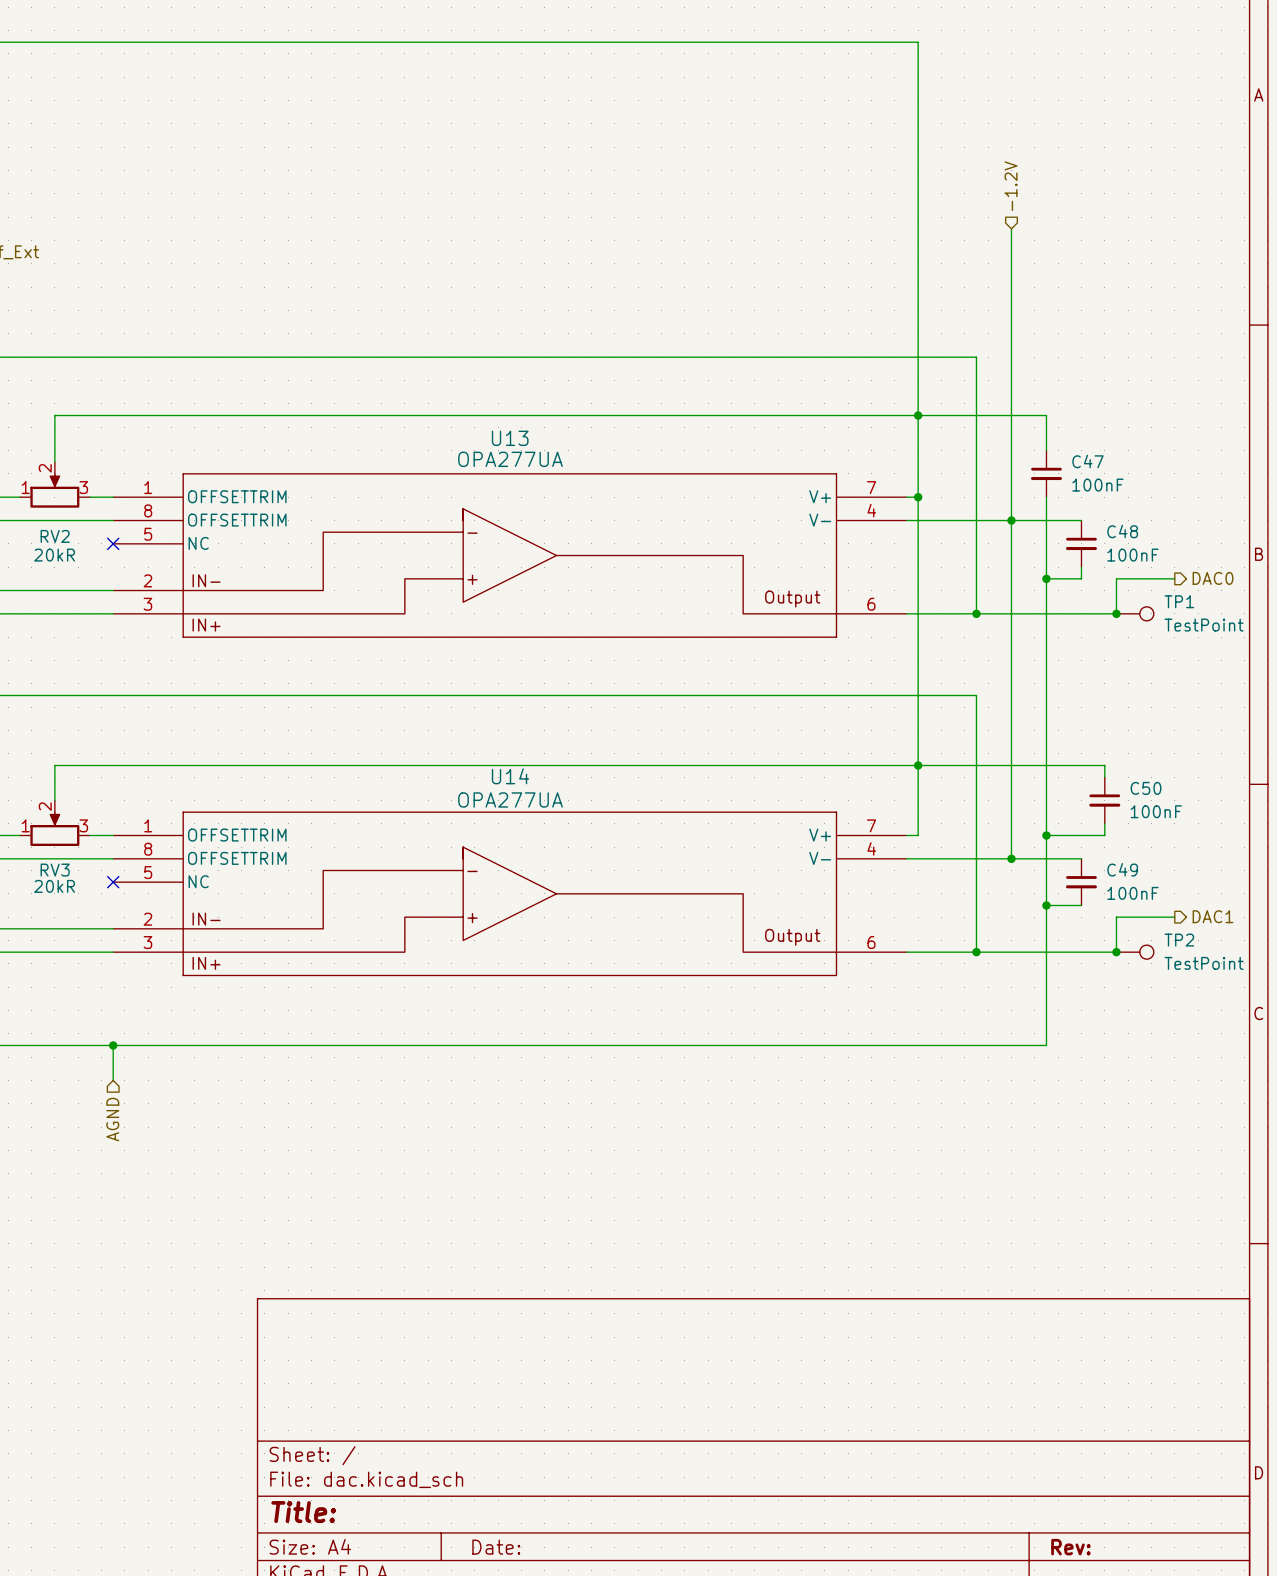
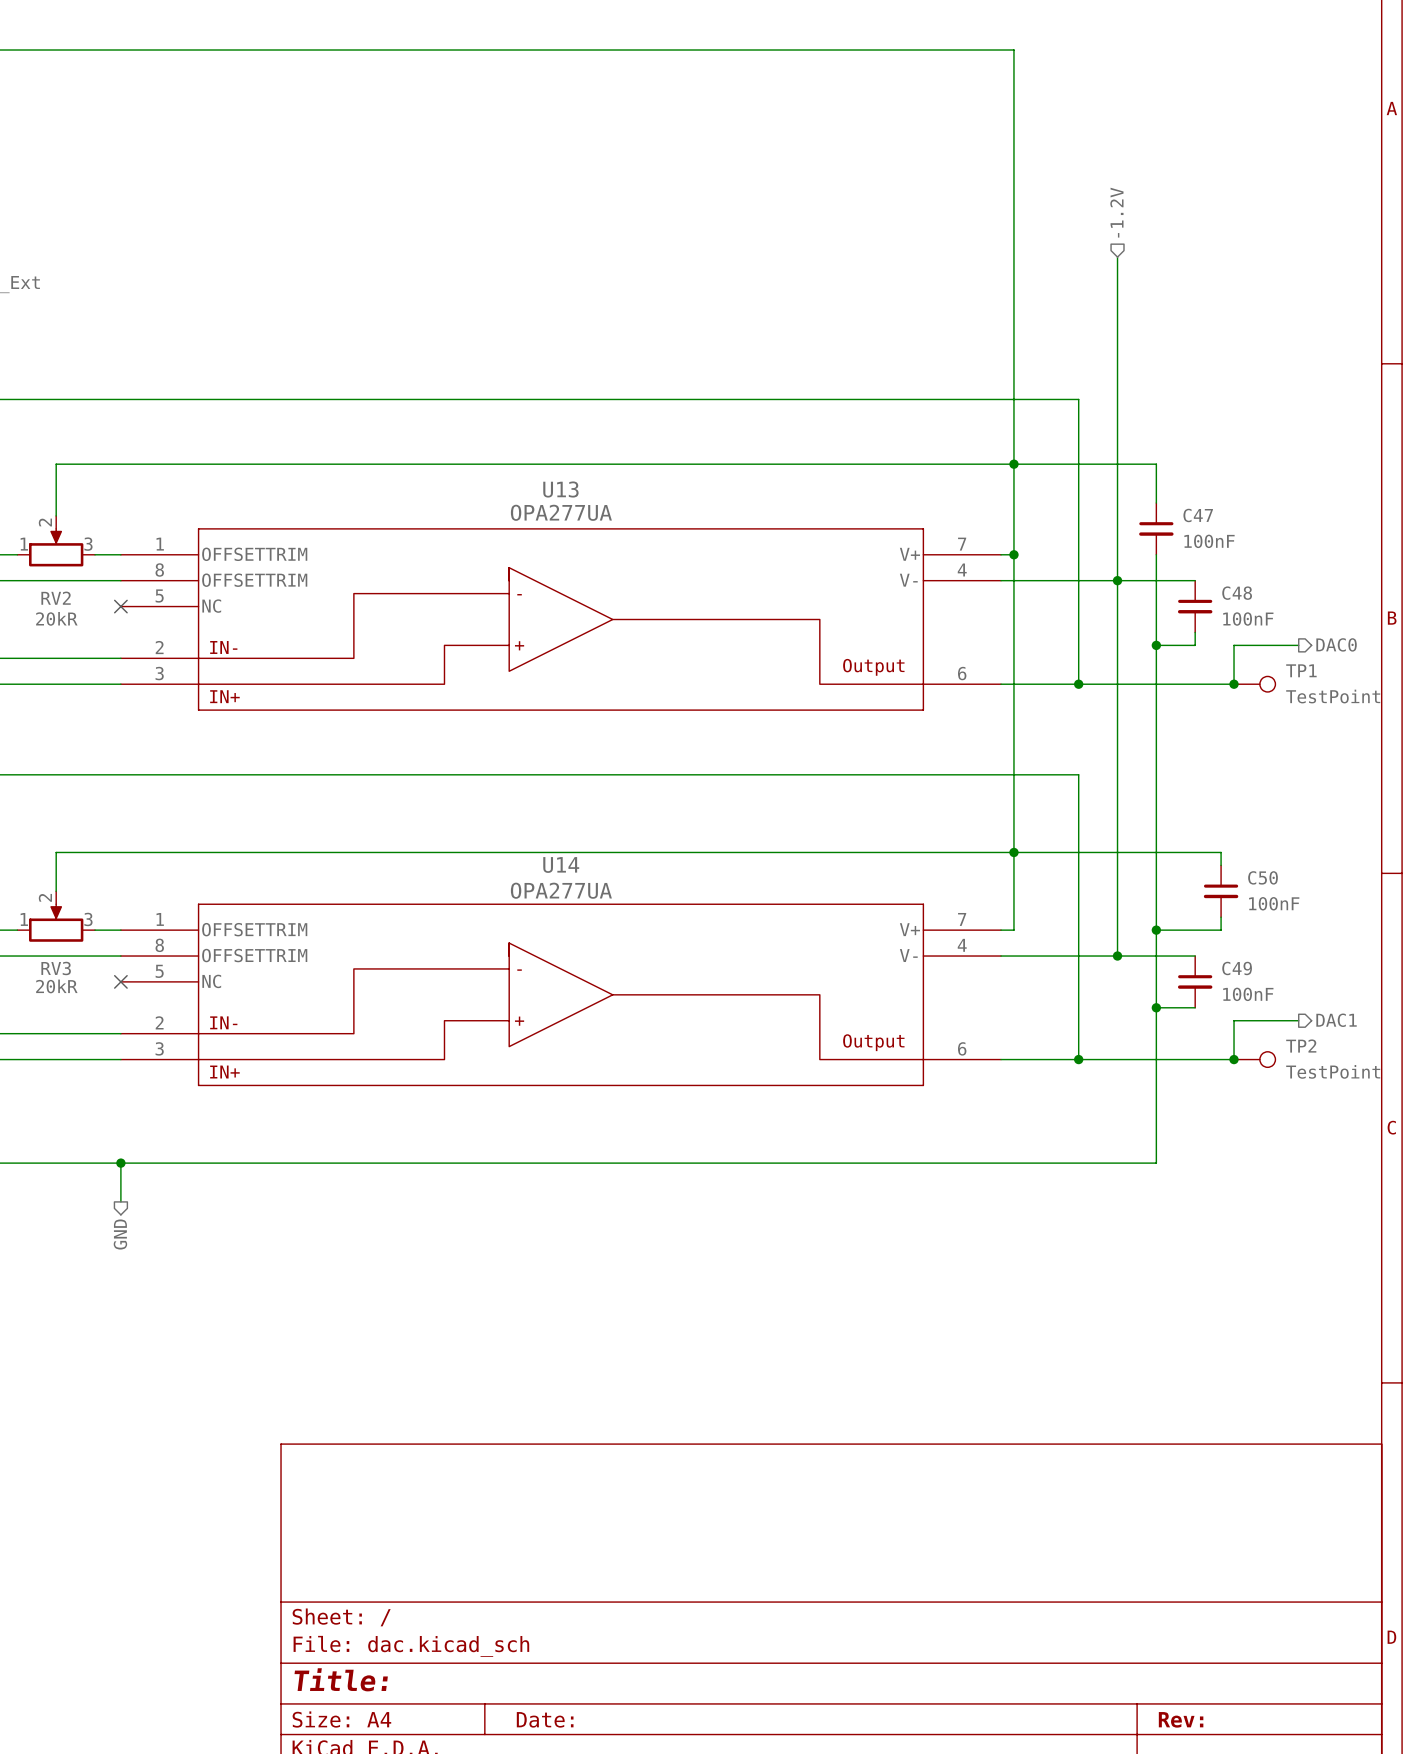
hierarchical label shape: input (112, 1119) -> output (120, 1234)
hierarchical label: AGND (112, 1119) -> GND (120, 1234)

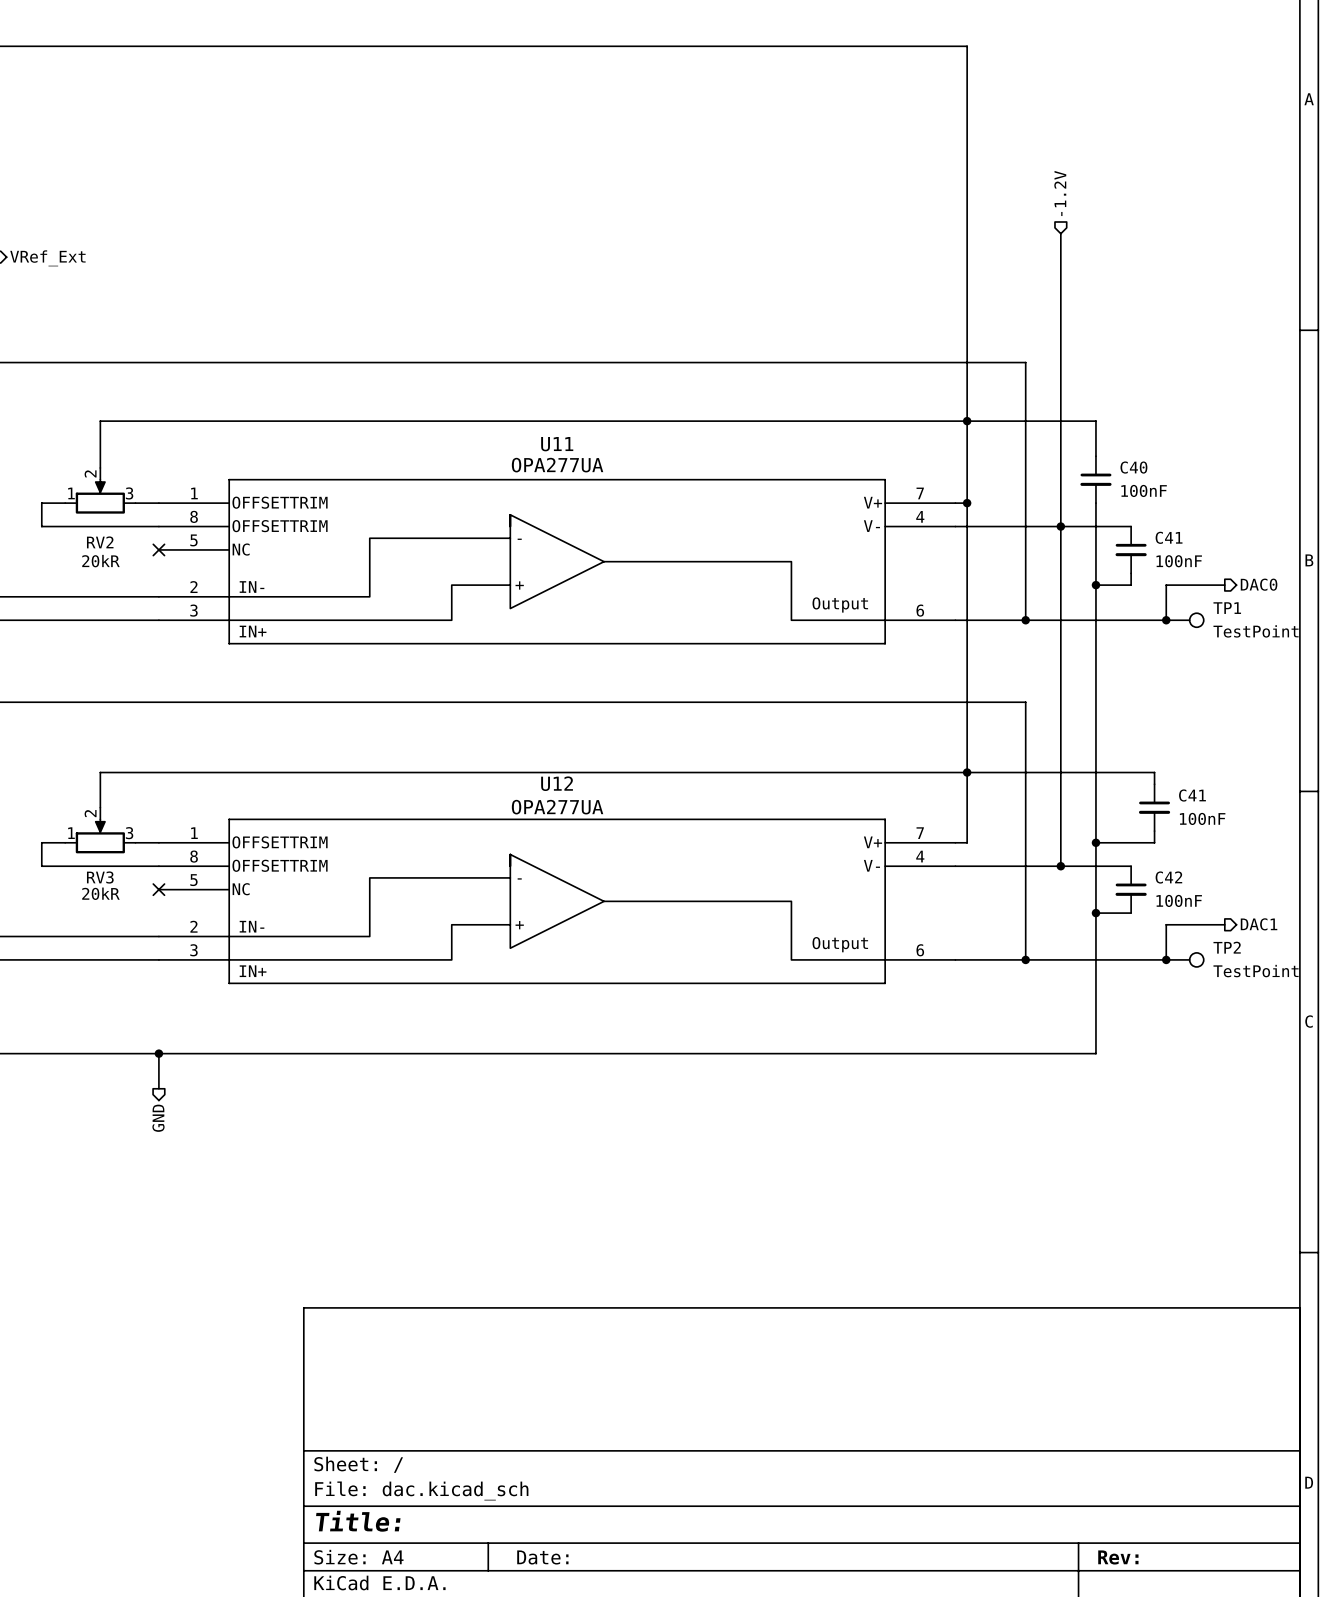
U13 name: U13 (560, 489) -> U11 (557, 444)
C47 name: C47 (1198, 515) -> C40 (1133, 467)
C48 name: C48 (1237, 593) -> C41 (1169, 537)
U14 name: U14 (561, 864) -> U12 (557, 783)
C50 name: C50 (1263, 877) -> C41 (1192, 795)
C49 name: C49 (1237, 968) -> C42 (1168, 877)

